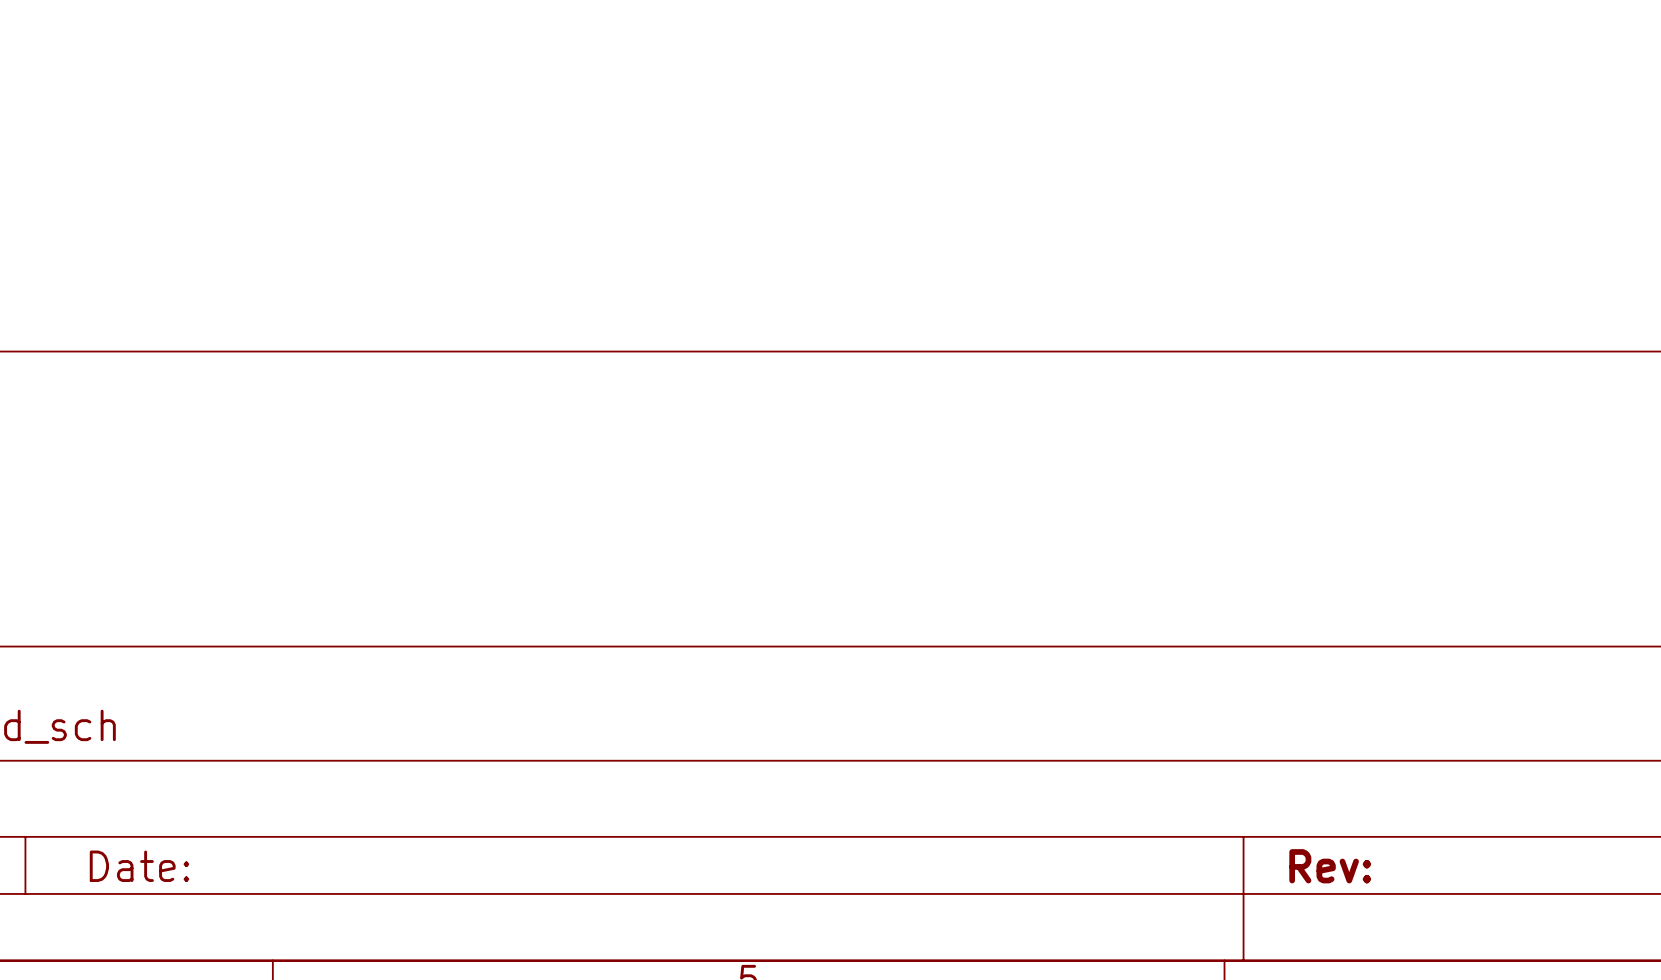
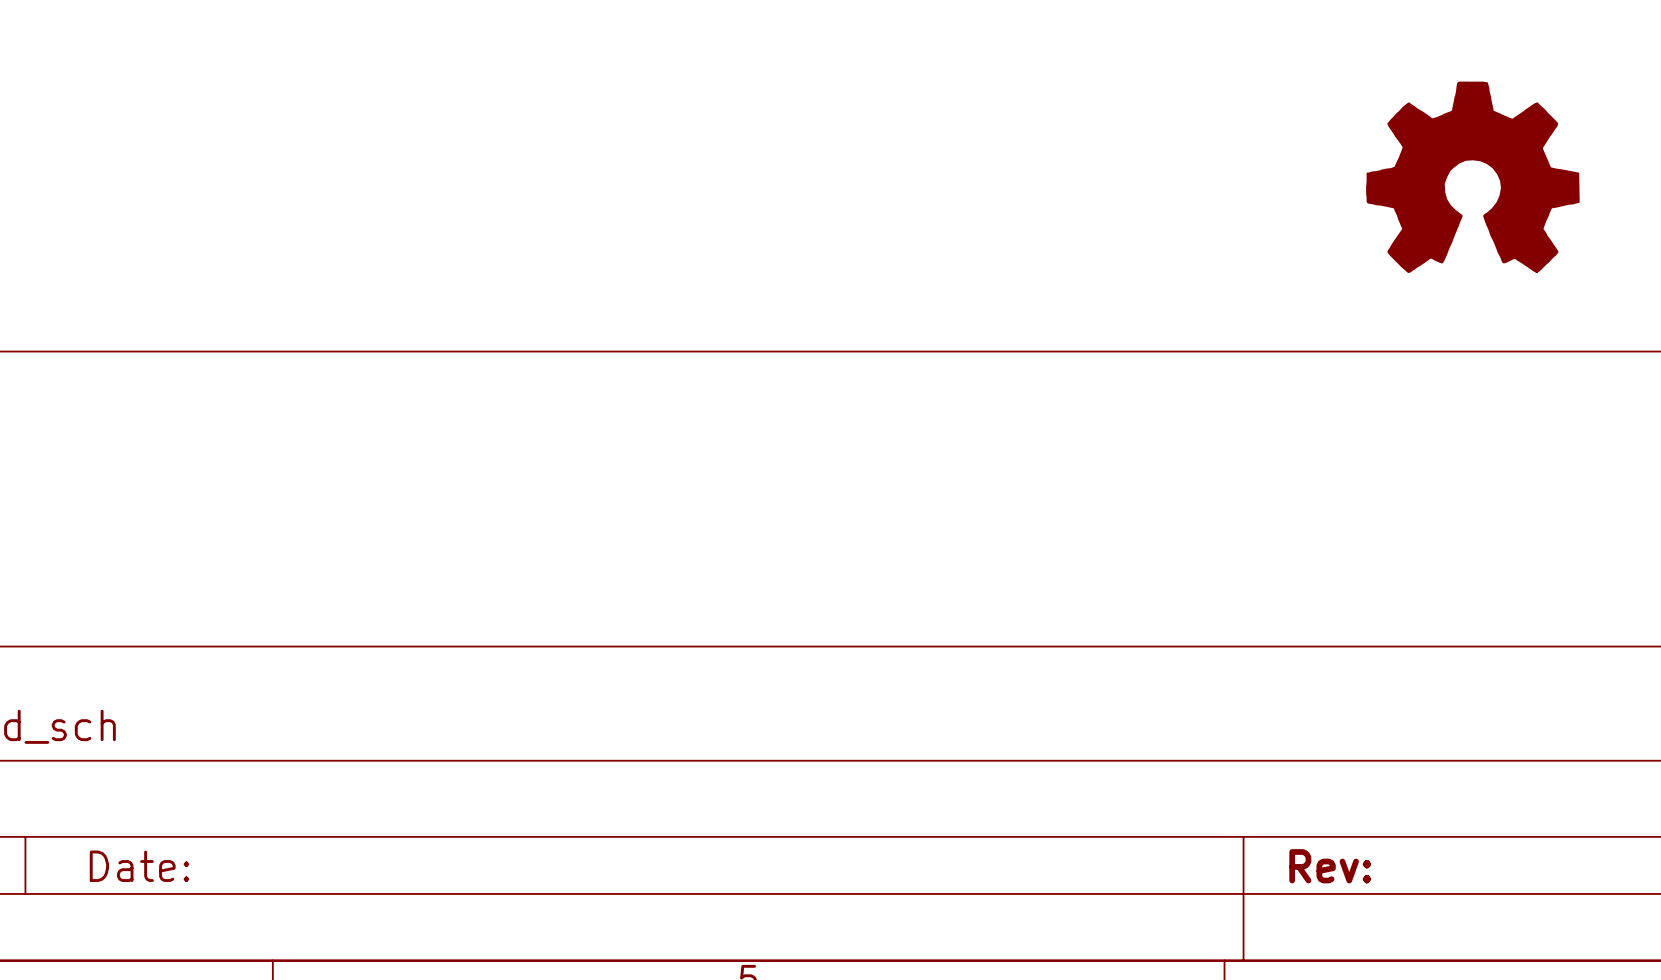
part: none -> (1472, 177)

